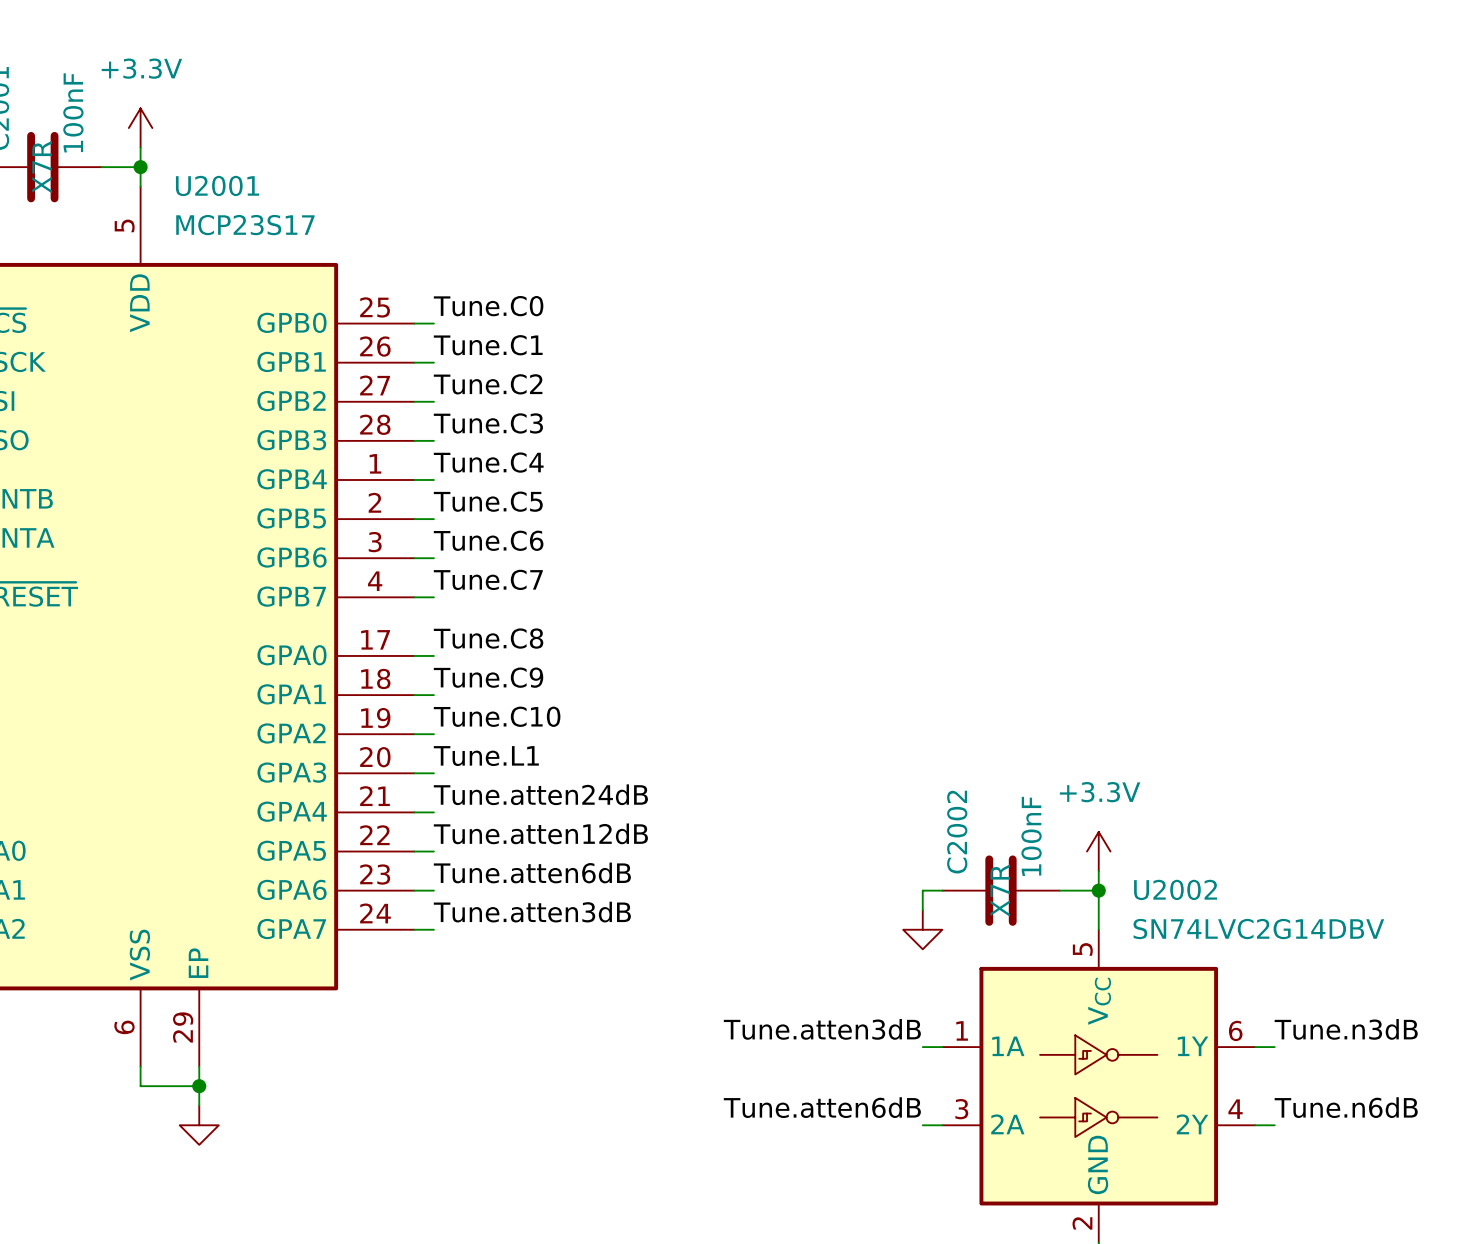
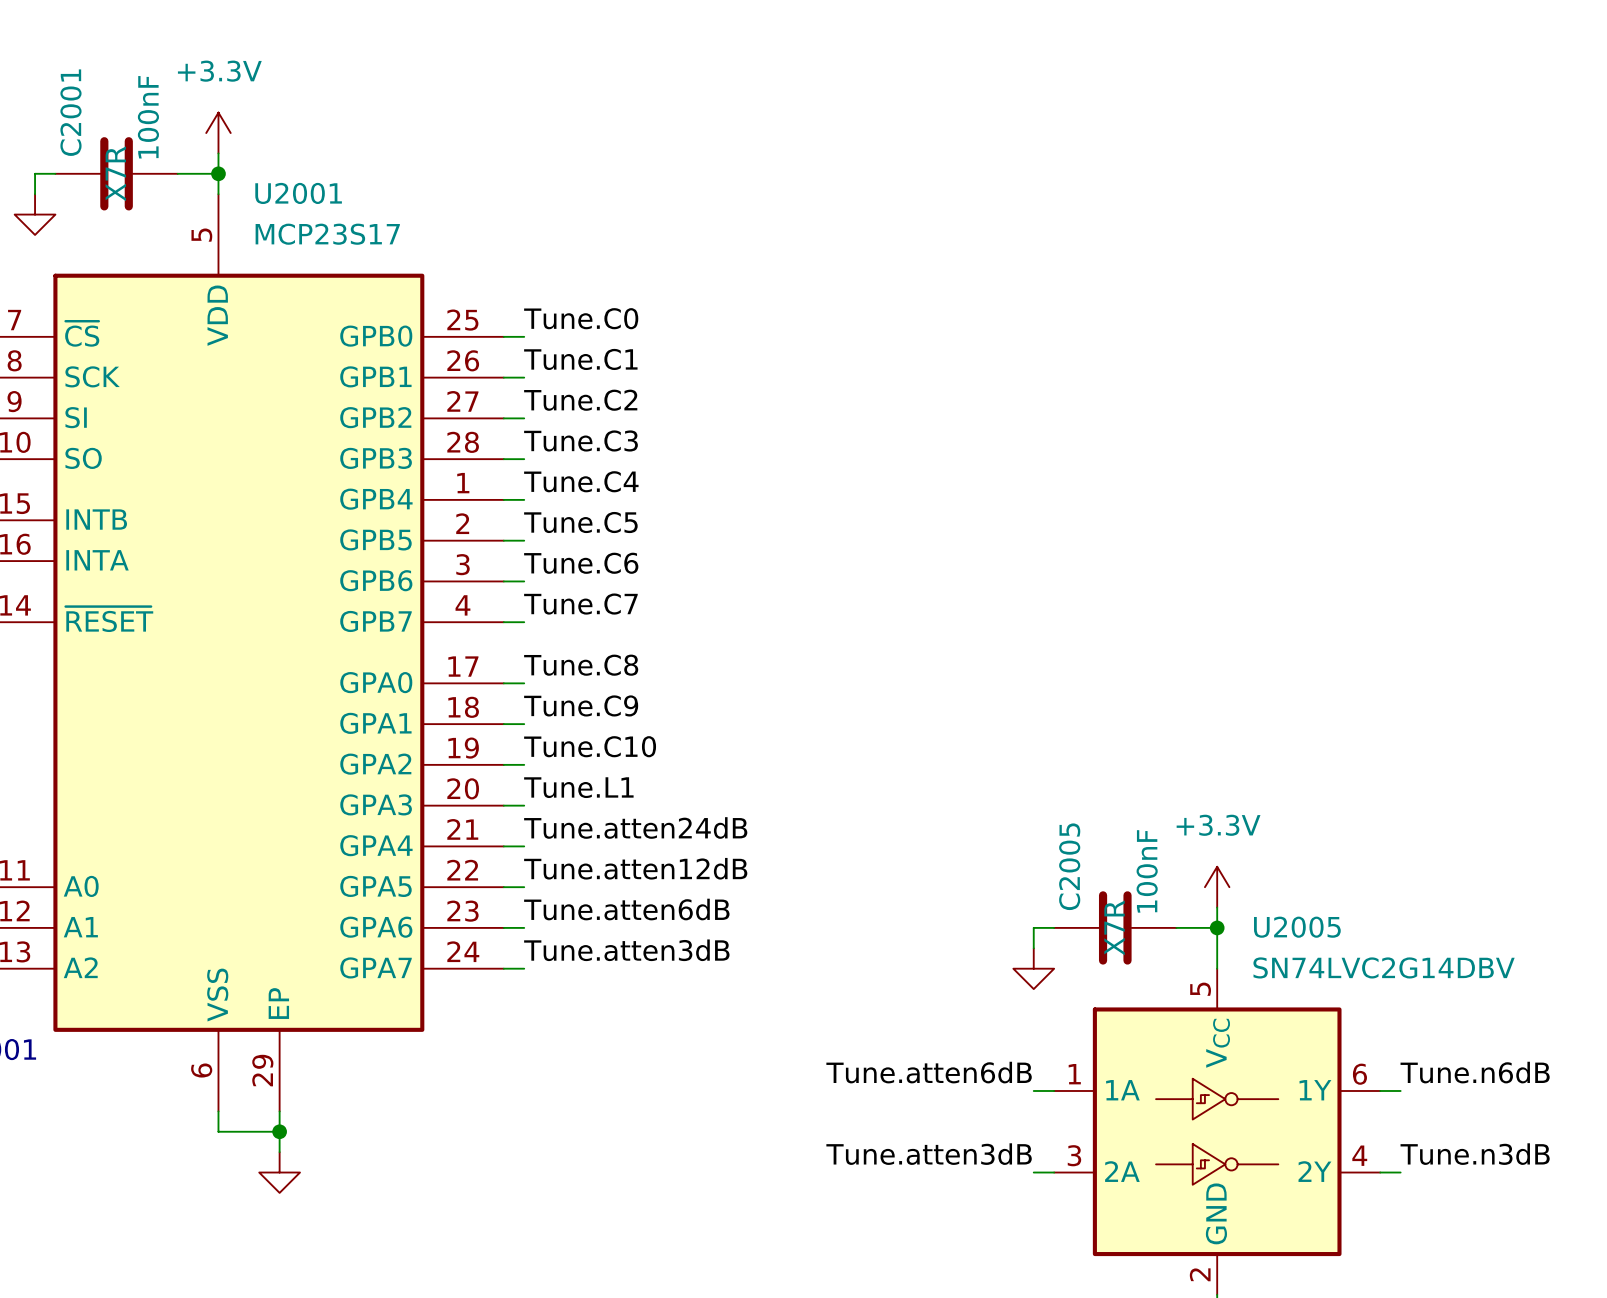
C2002 name: C2002 (957, 832) -> C2005 (1069, 866)
U2002 name: U2002 (1175, 889) -> U2005 (1297, 927)
label: Tune.atten3dB (822, 1029) -> Tune.atten6dB (929, 1072)
label: Tune.n3dB (1346, 1029) -> Tune.n6dB (1475, 1072)
label: Tune.atten6dB (822, 1107) -> Tune.atten3dB (929, 1154)
label: Tune.n6dB (1346, 1107) -> Tune.n3dB (1475, 1154)

